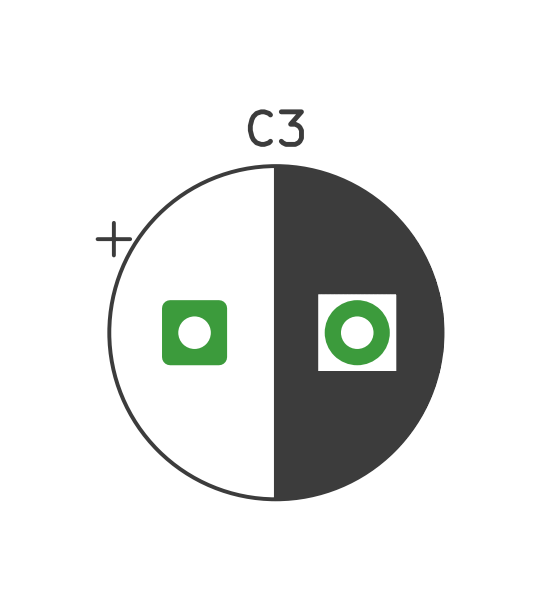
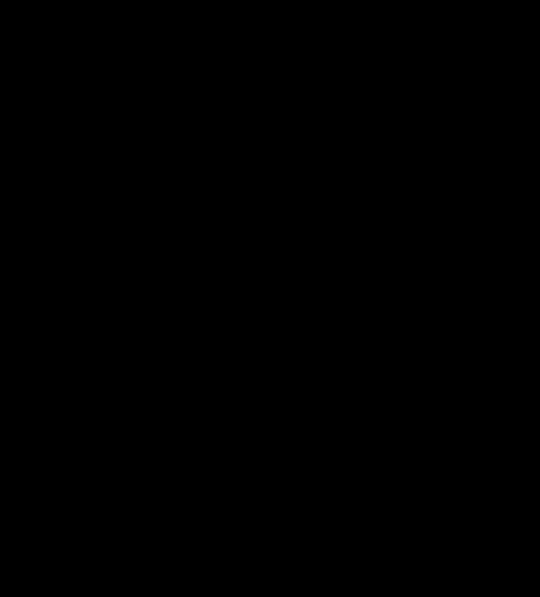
C3: (270, 332) -> none

